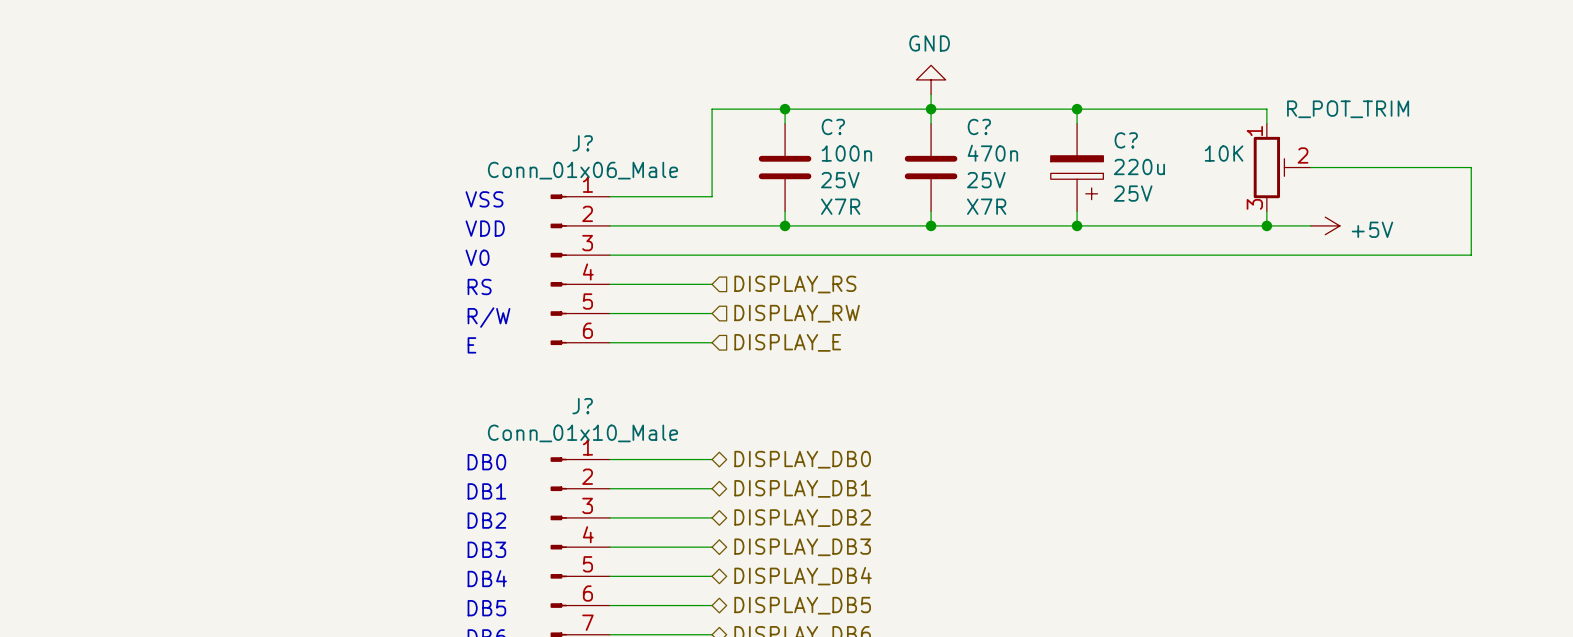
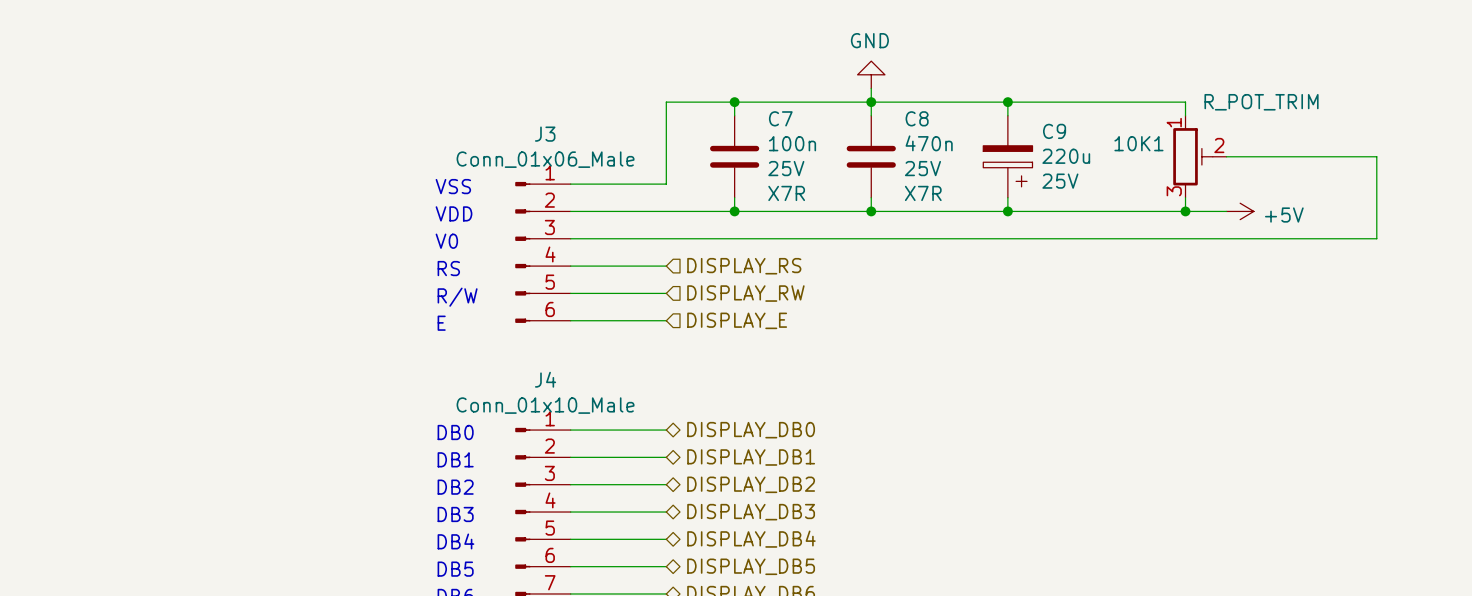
C? name: C? (833, 126) -> C7 (780, 118)
C? name: C? (979, 126) -> C8 (917, 118)
C? name: C? (1126, 140) -> C9 (1054, 131)
J? name: J? (582, 143) -> J3 (545, 134)
10K name: 10K (1224, 153) -> 10K1 (1138, 143)
J? name: J? (582, 406) -> J4 (545, 379)

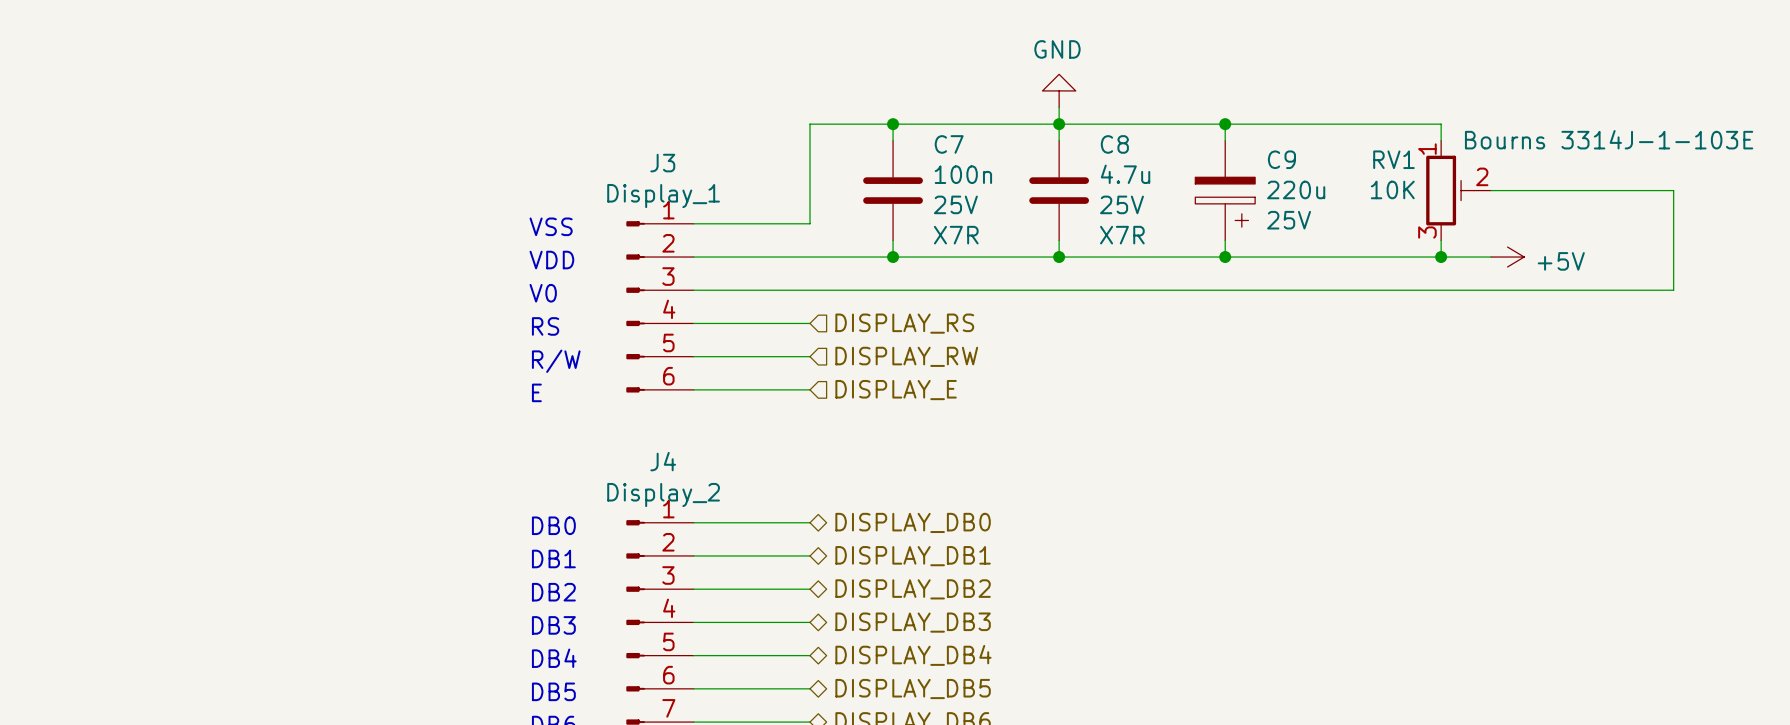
10K1 value: R_POT_TRIM (1261, 102) -> 10K (1392, 189)
10K1 text: none -> Bourns 3314J-1-103E (1609, 139)
C8 value: 470n (929, 143) -> 4.7u (1125, 174)
10K1 name: 10K1 (1138, 143) -> RV1 (1393, 159)
J3 value: Conn_01x06_Male (545, 159) -> Display_1 (663, 196)
J4 value: Conn_01x10_Male (545, 405) -> Display_2 (663, 495)

